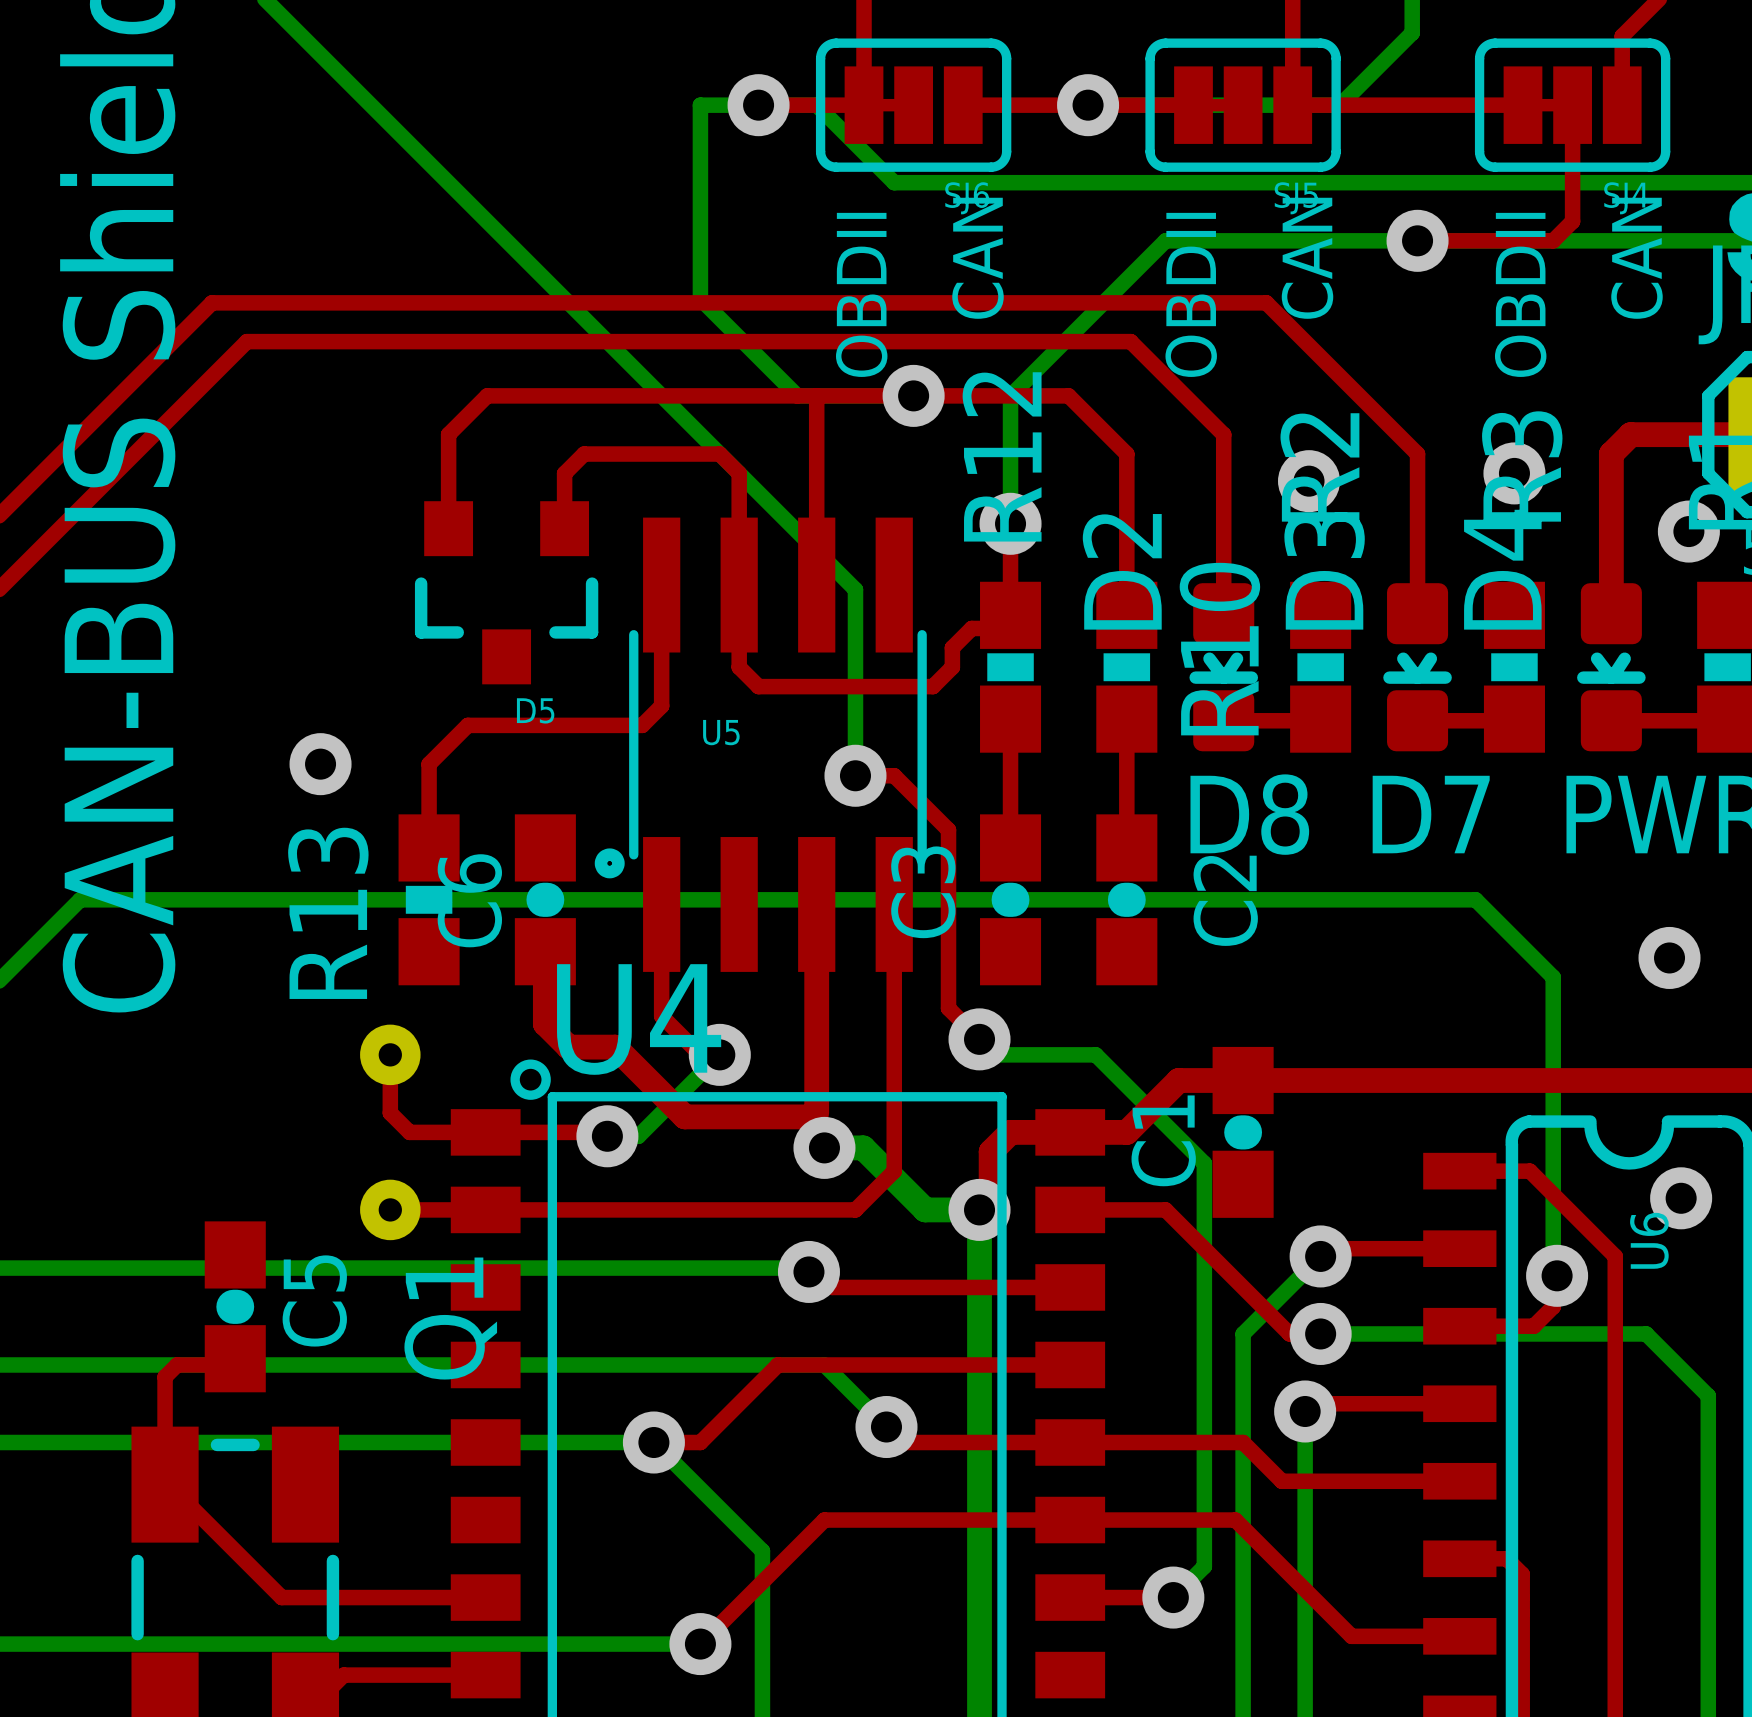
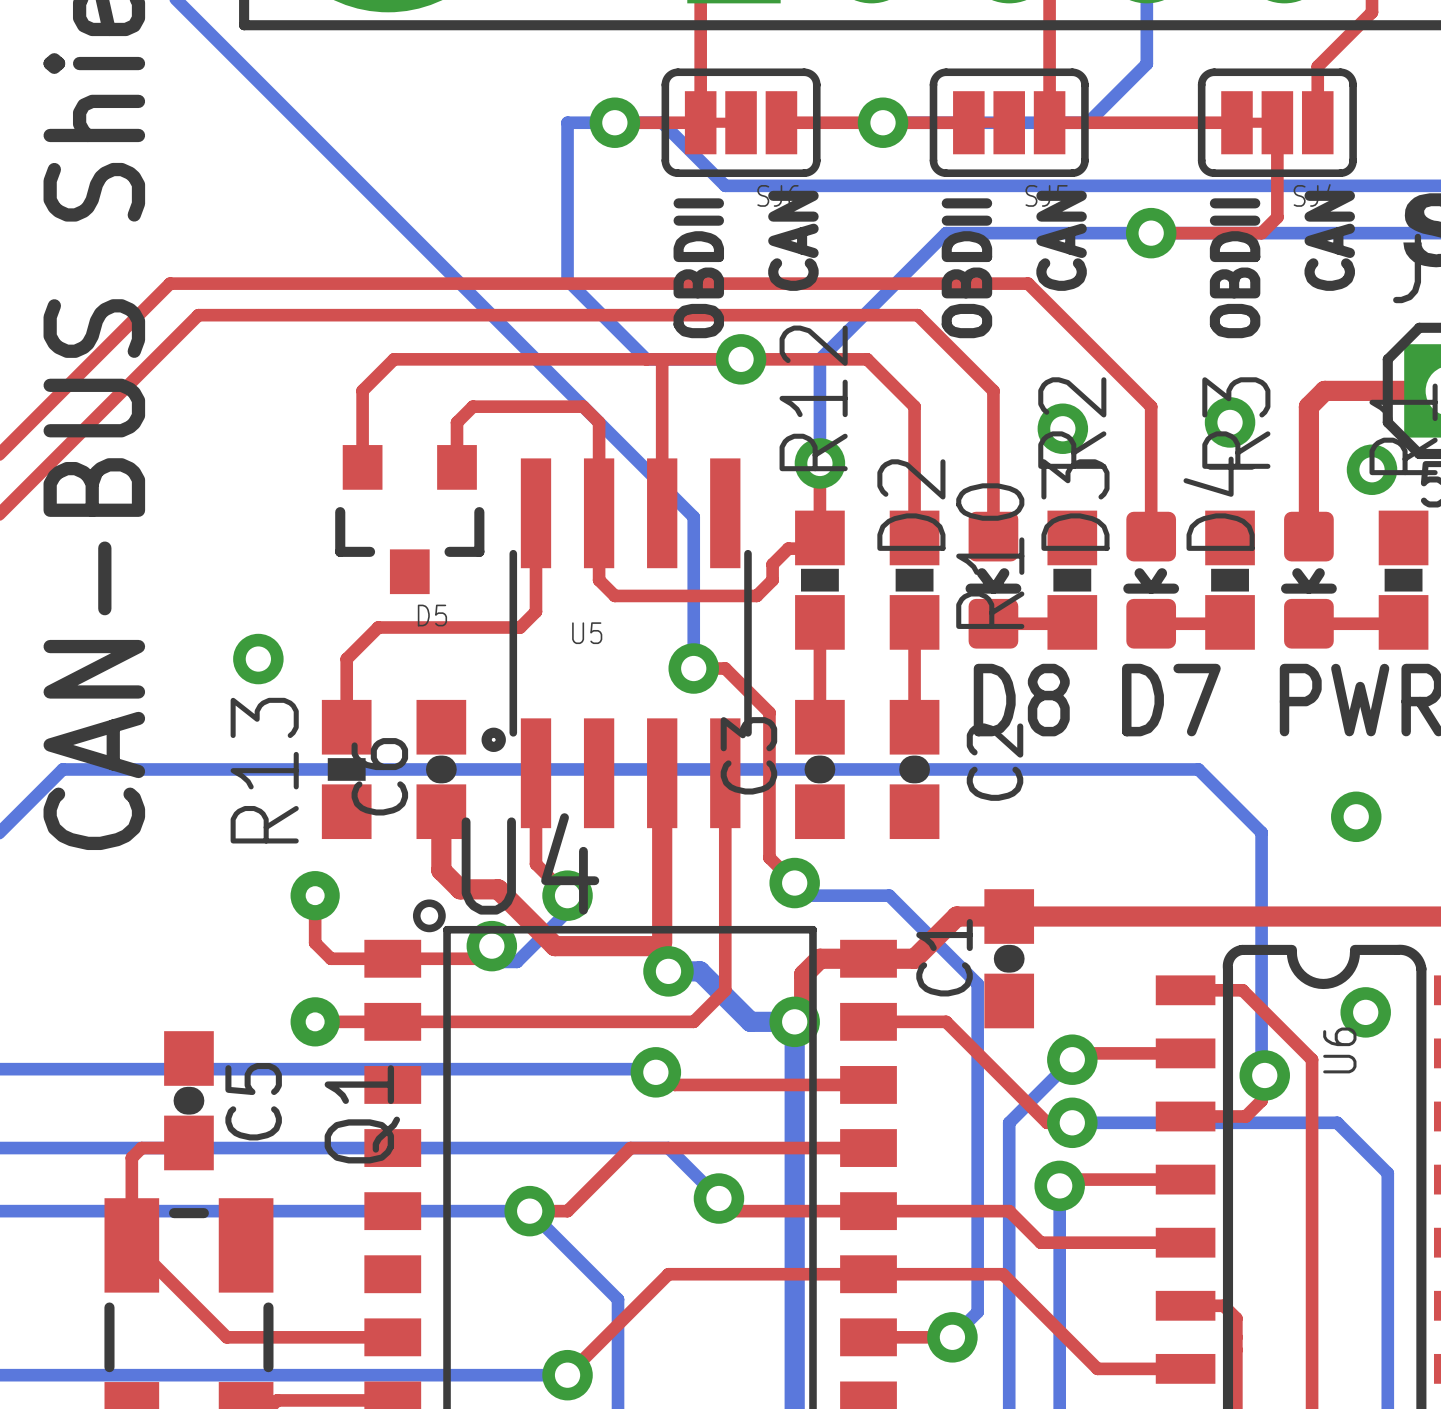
via position: (719, 1054) -> (567, 895)
via position: (607, 1136) -> (491, 946)

